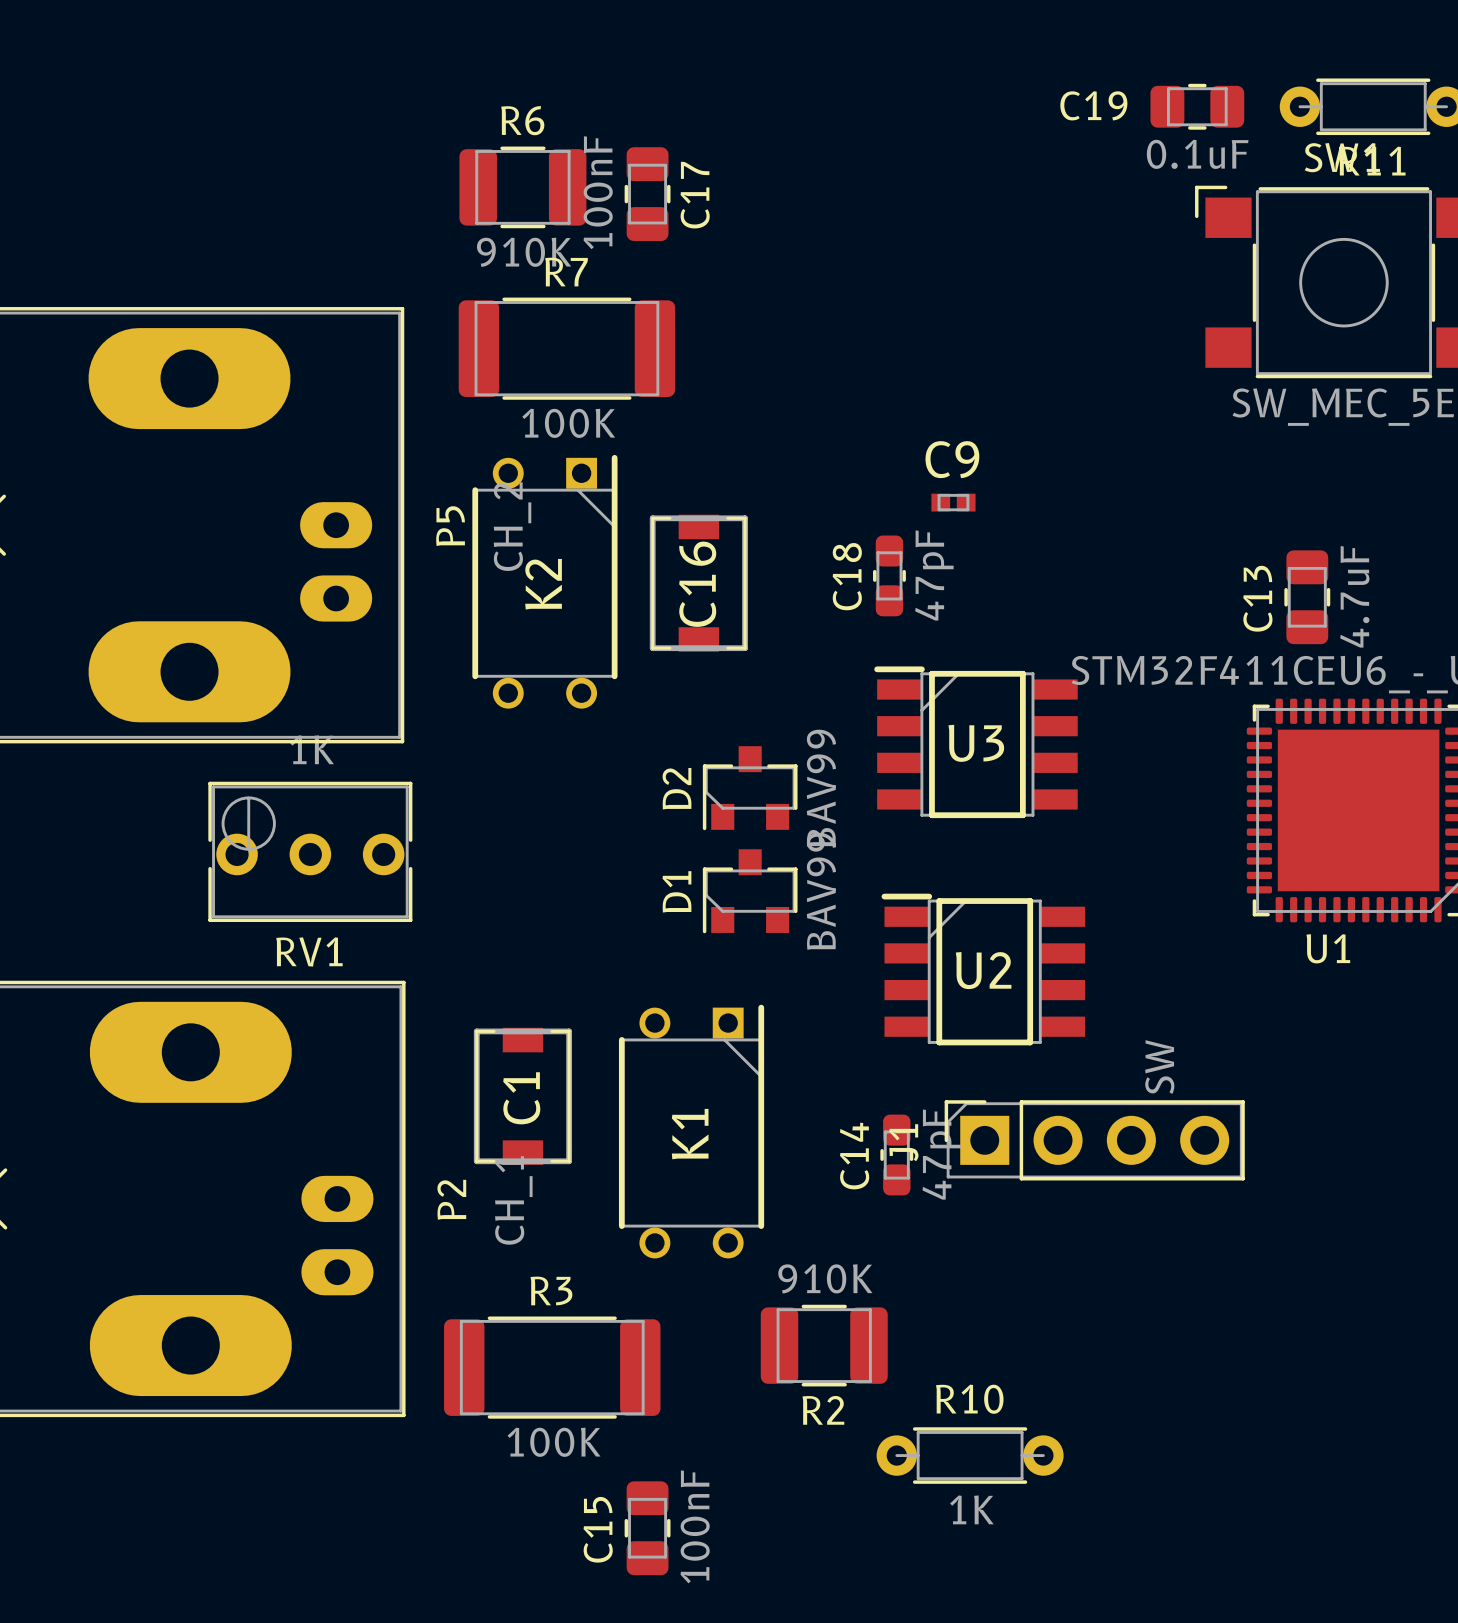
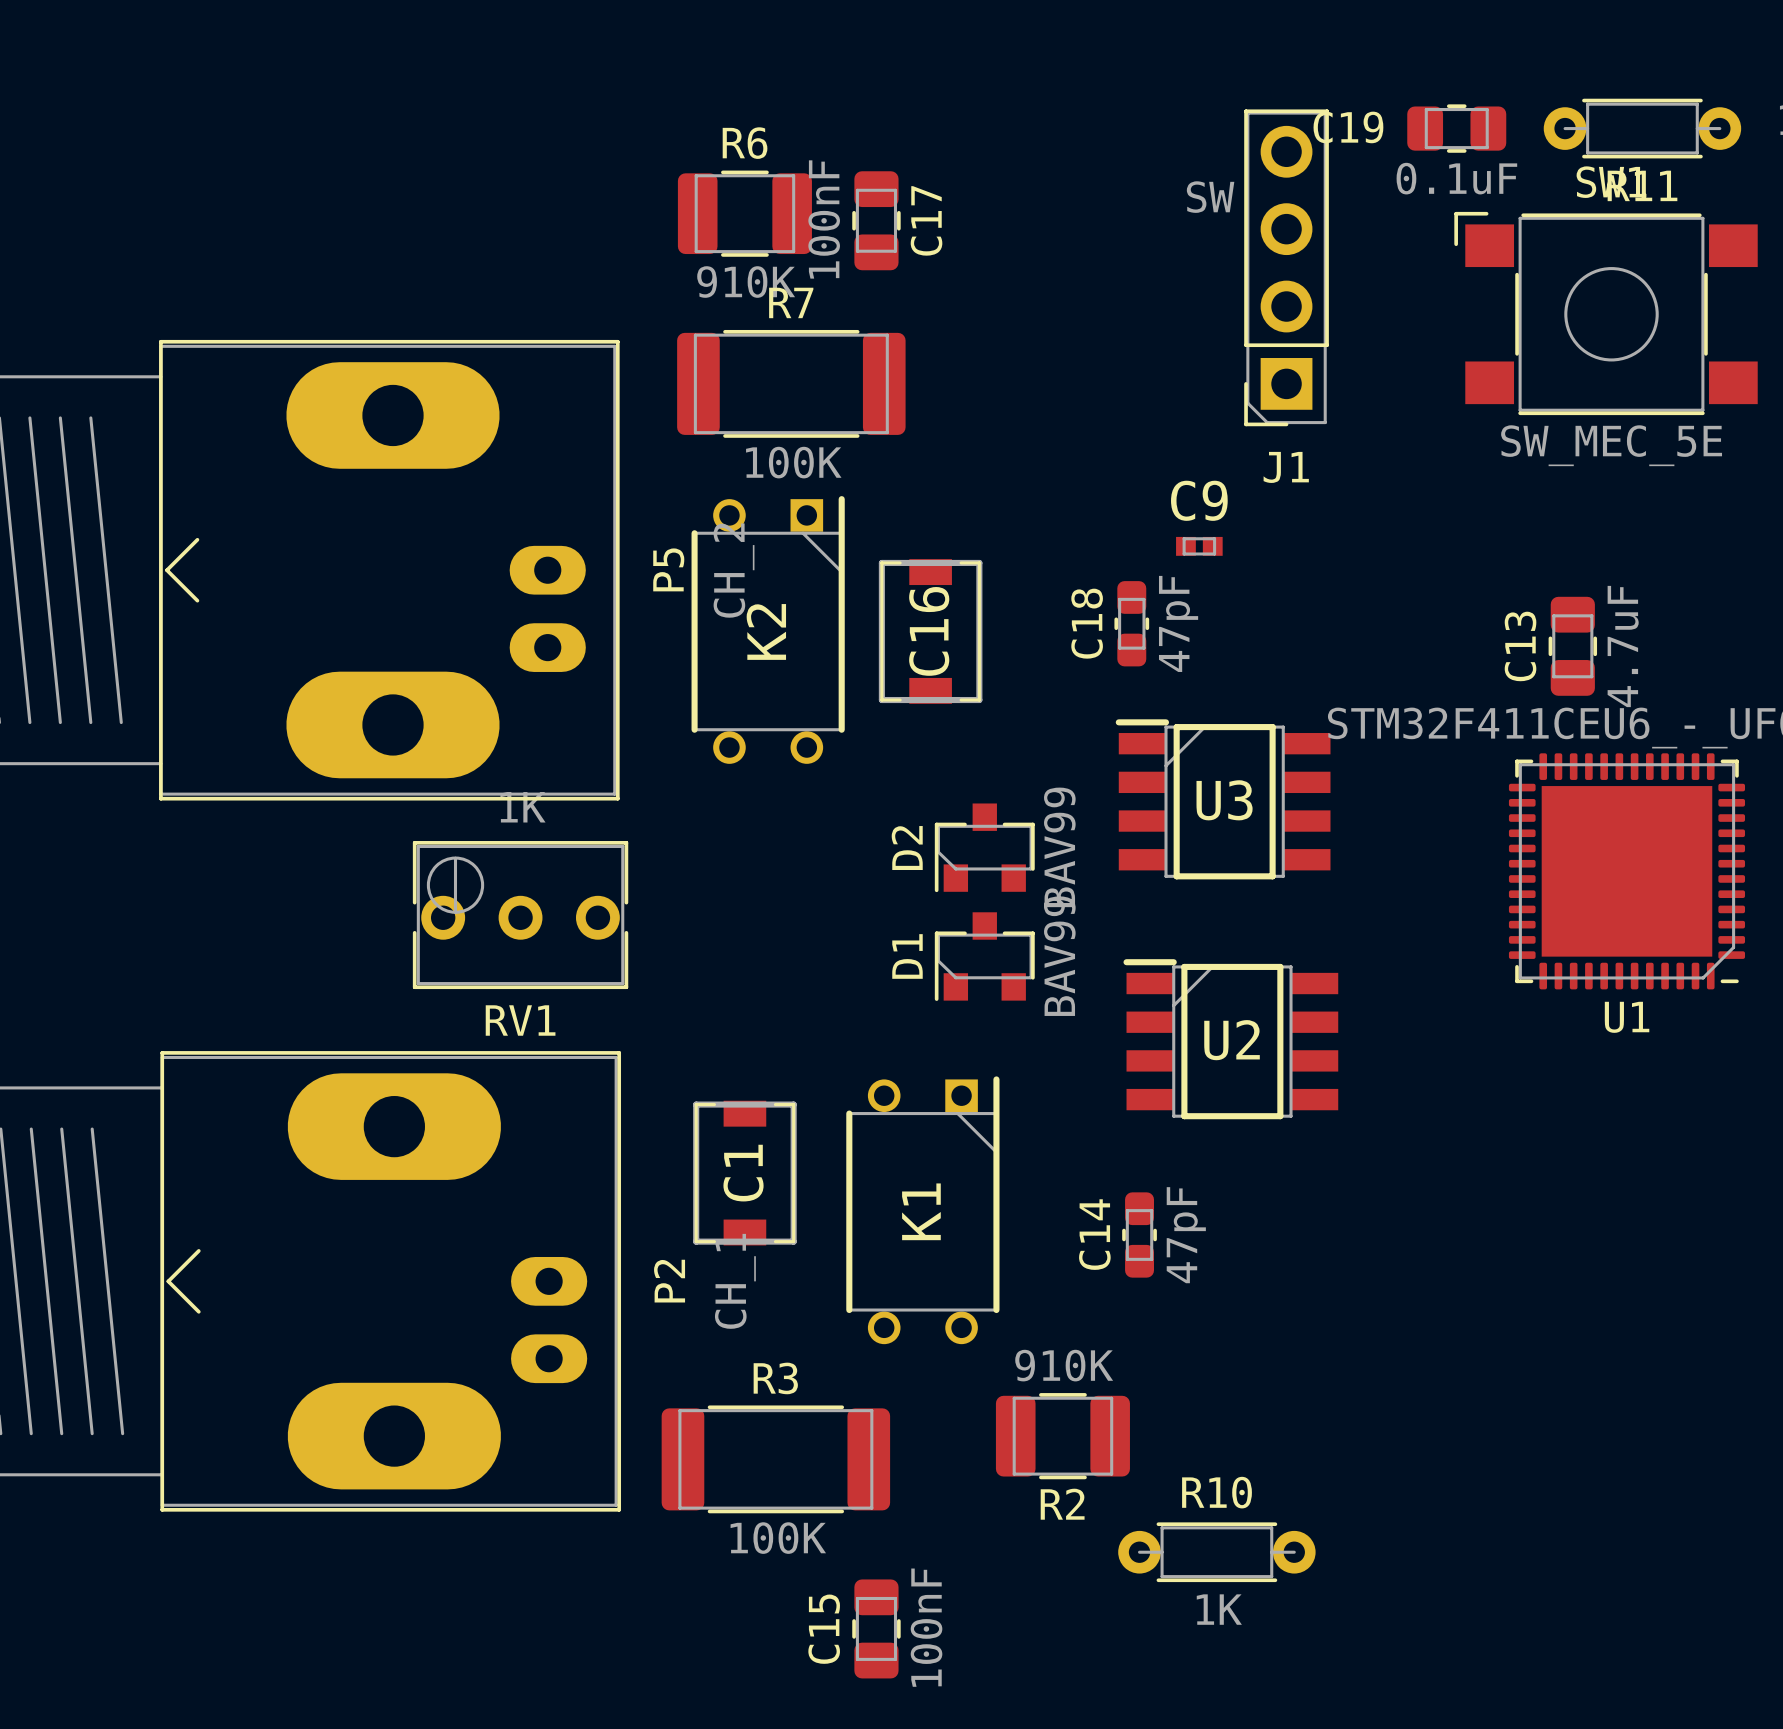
U1 name position: U1 (1328, 948) -> U1 (1627, 1017)
J1 rotation: 0° (1094, 1140) -> 90° counterclockwise (1286, 267)
J1 position: (1094, 1140) -> (1286, 267)

